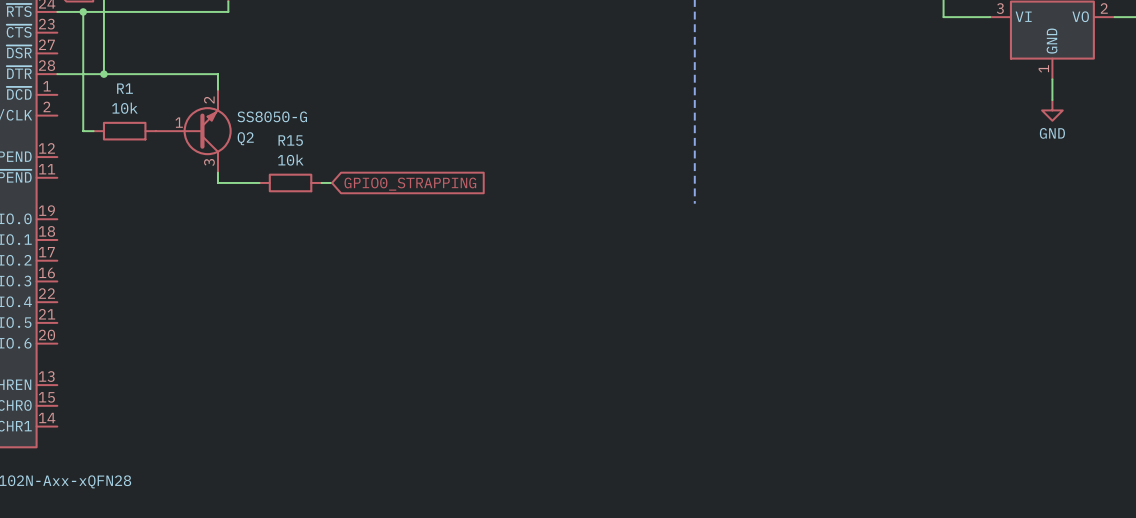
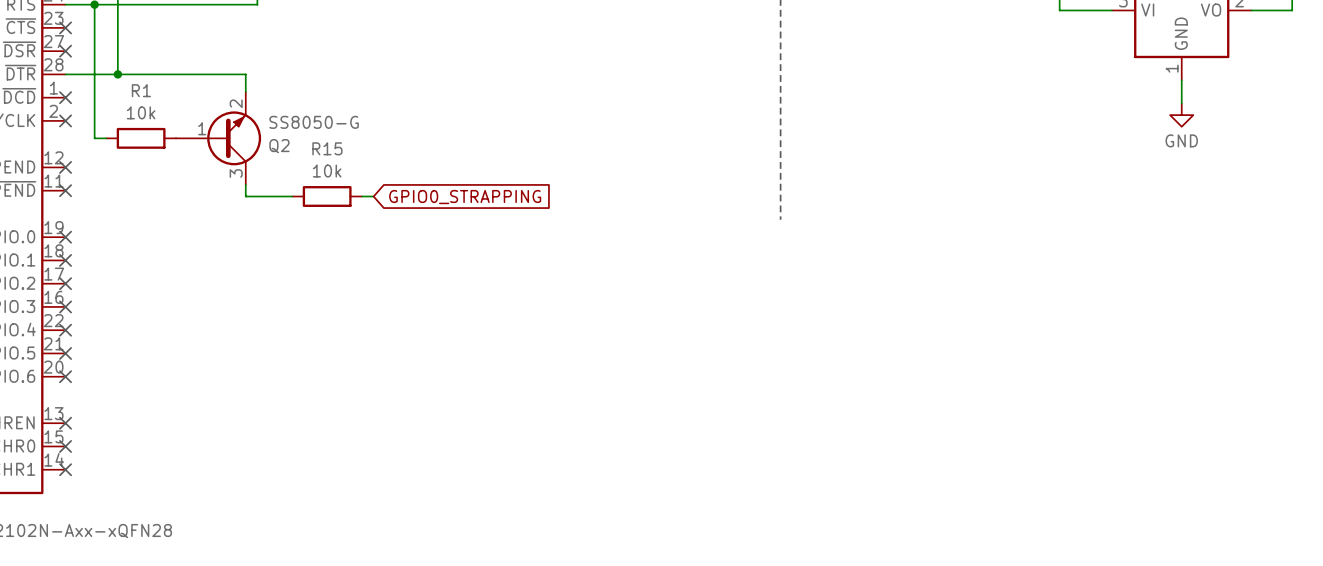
no-connect mark: none -> (65, 27)
no-connect mark: none -> (65, 51)
no-connect mark: none -> (65, 97)
no-connect mark: none -> (65, 120)
no-connect mark: none -> (65, 167)
no-connect mark: none -> (65, 190)
no-connect mark: none -> (65, 237)
no-connect mark: none -> (65, 260)
no-connect mark: none -> (65, 283)
no-connect mark: none -> (65, 306)
no-connect mark: none -> (65, 330)
no-connect mark: none -> (65, 353)
no-connect mark: none -> (65, 376)
no-connect mark: none -> (65, 423)
no-connect mark: none -> (65, 446)
no-connect mark: none -> (65, 469)

